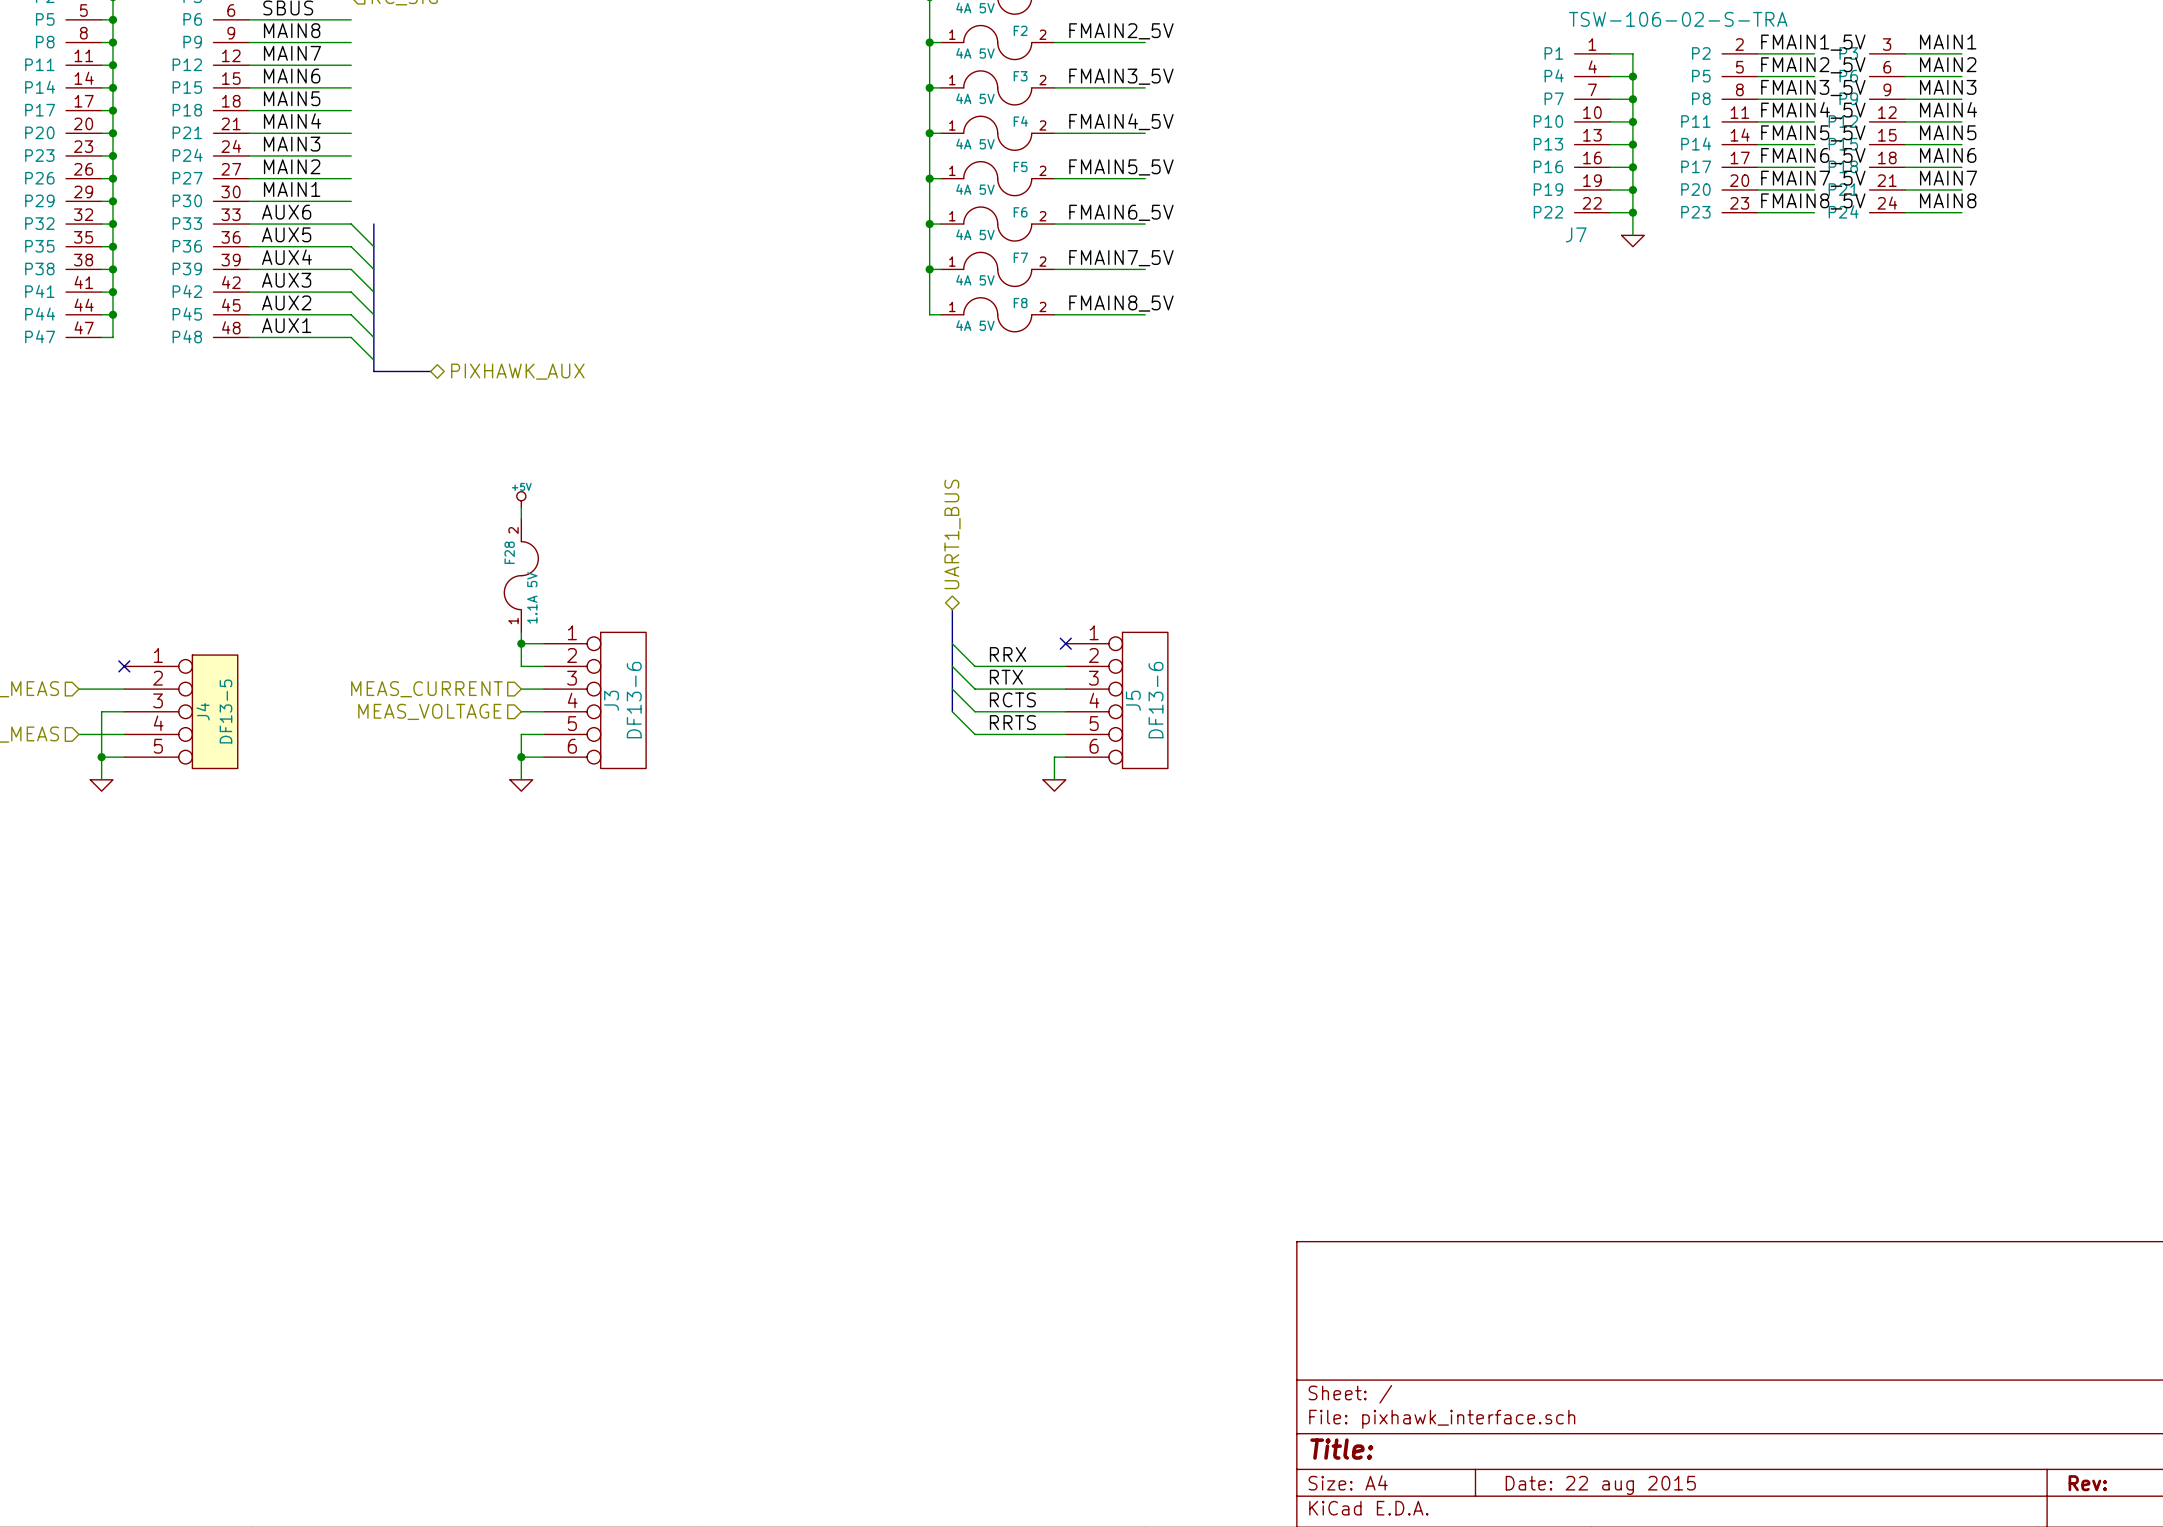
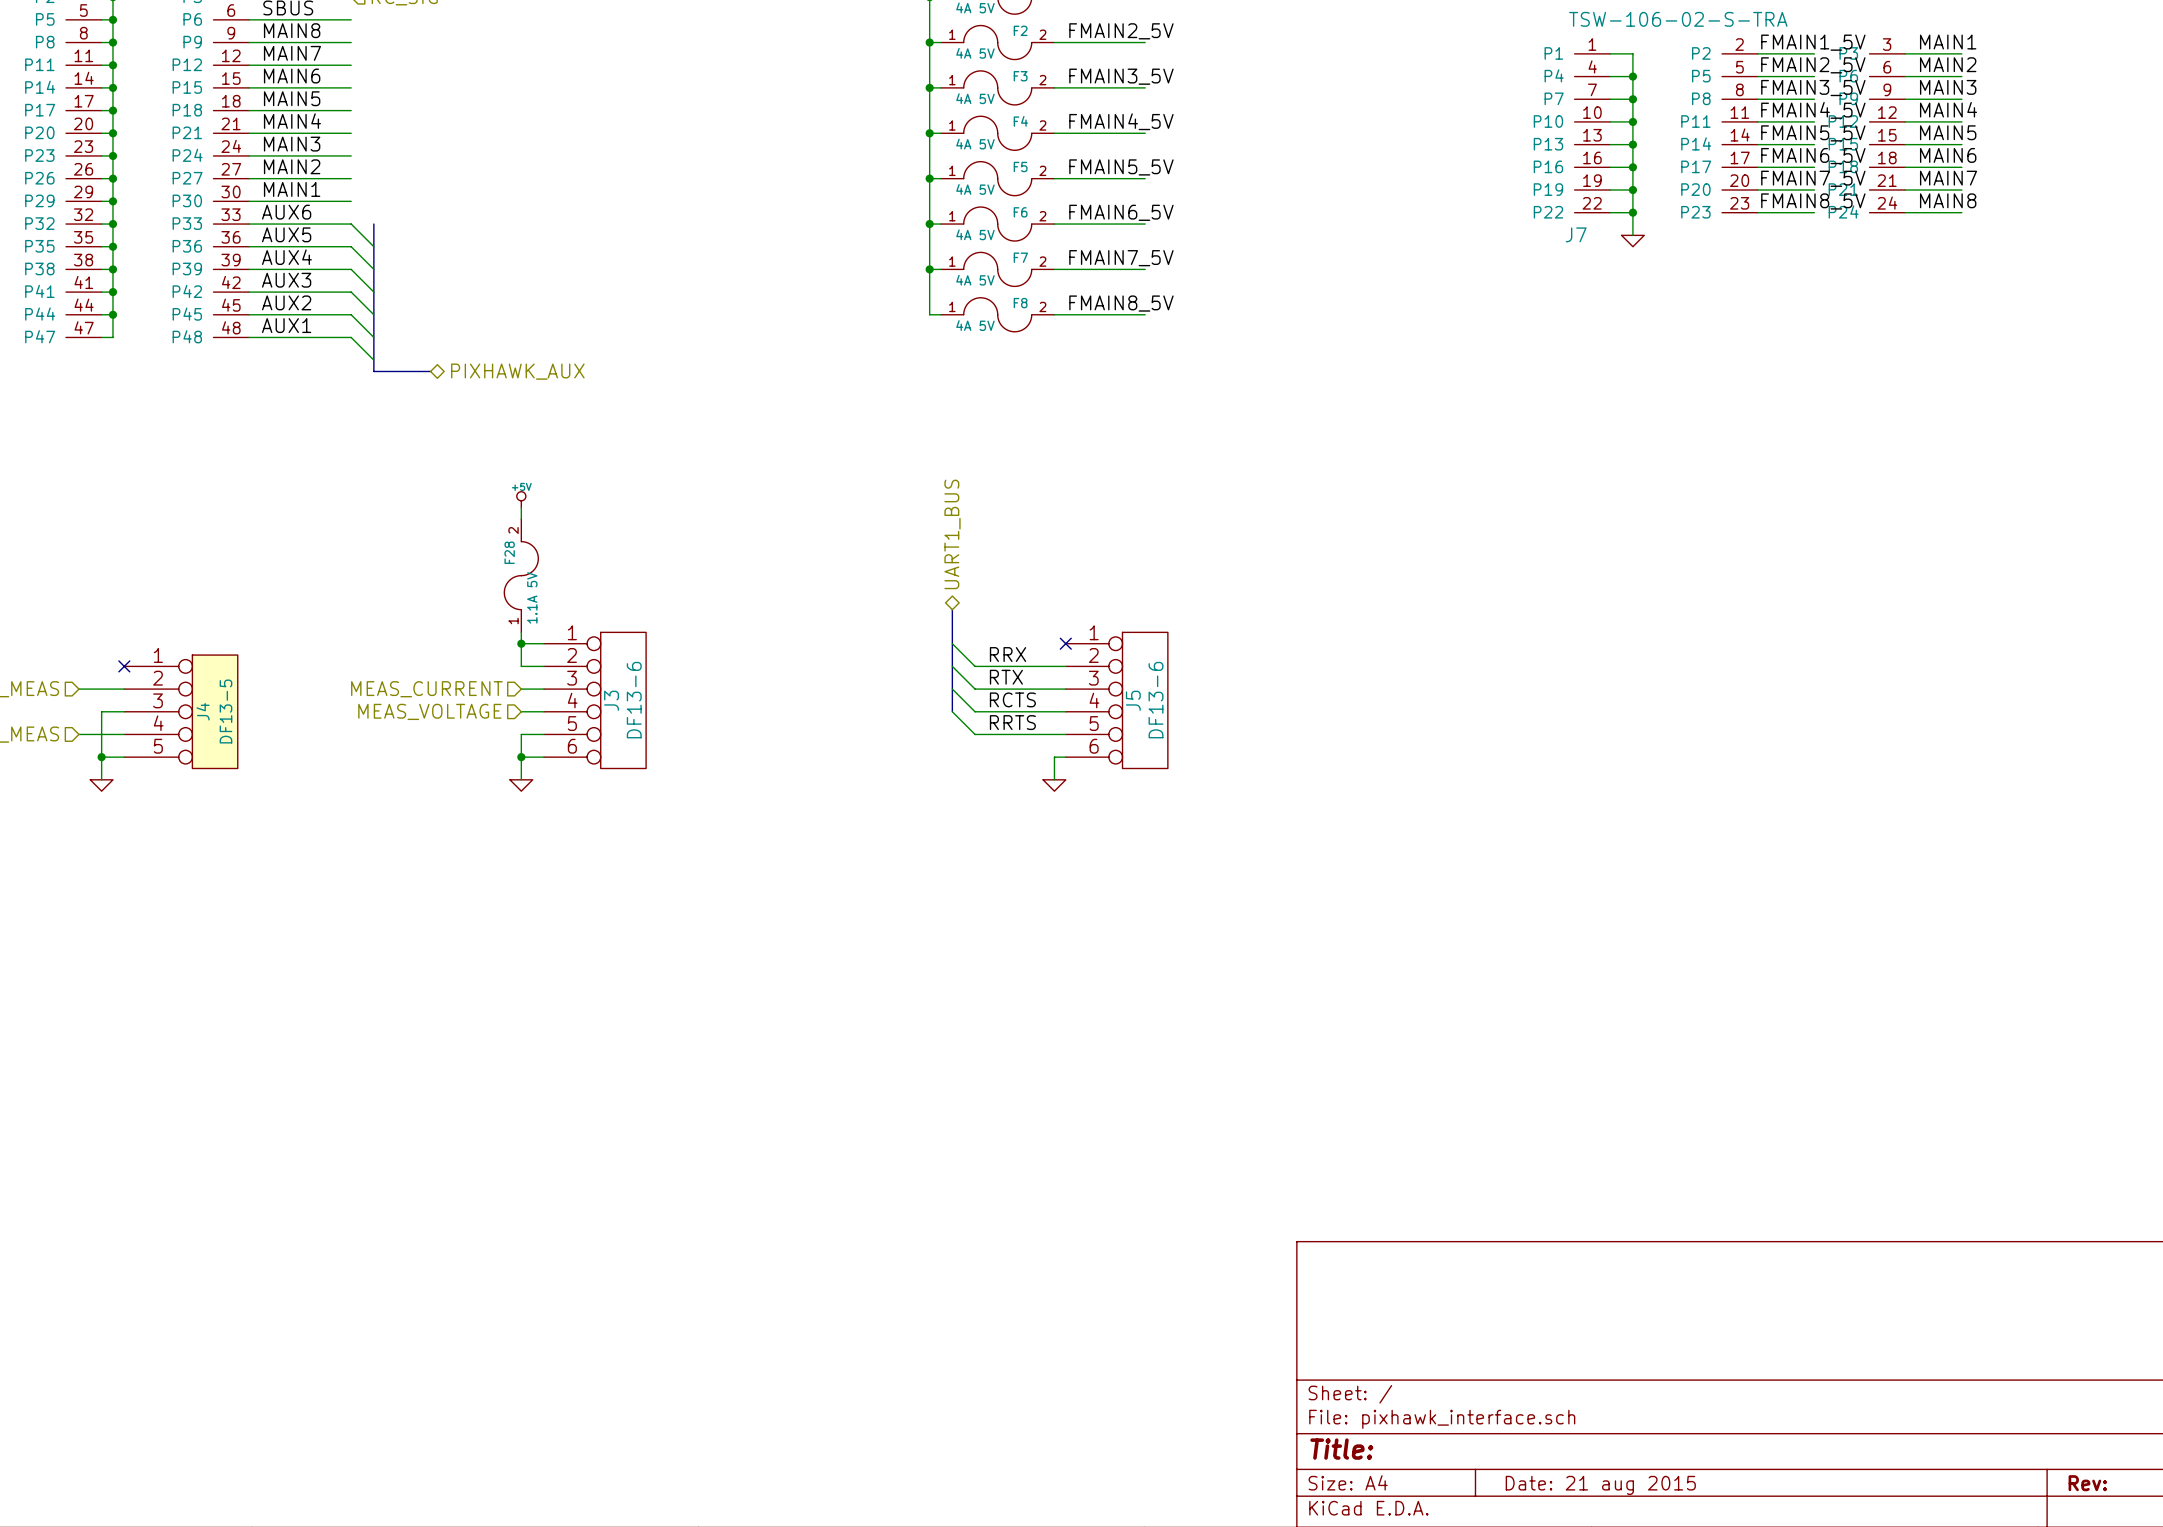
title block: Date: 22 aug 2015 (1600, 1485) -> Date: 21 aug 2015 (1600, 1485)

